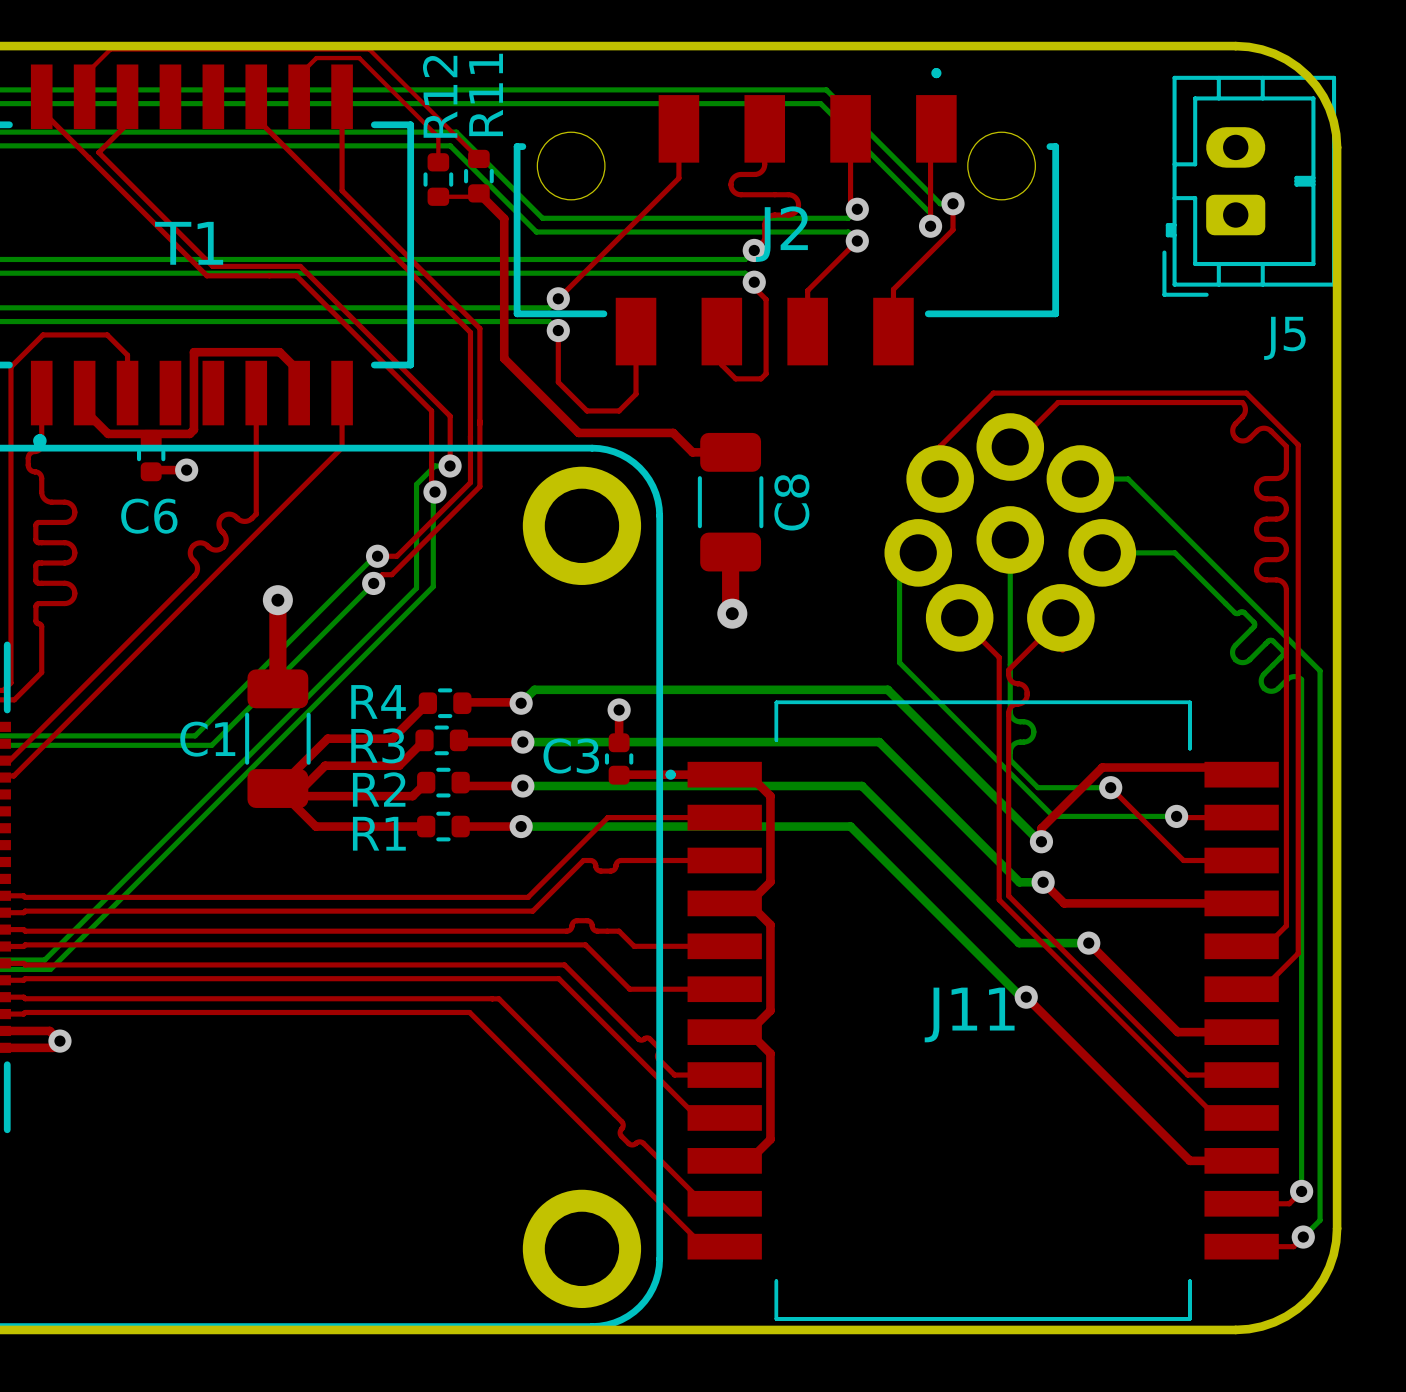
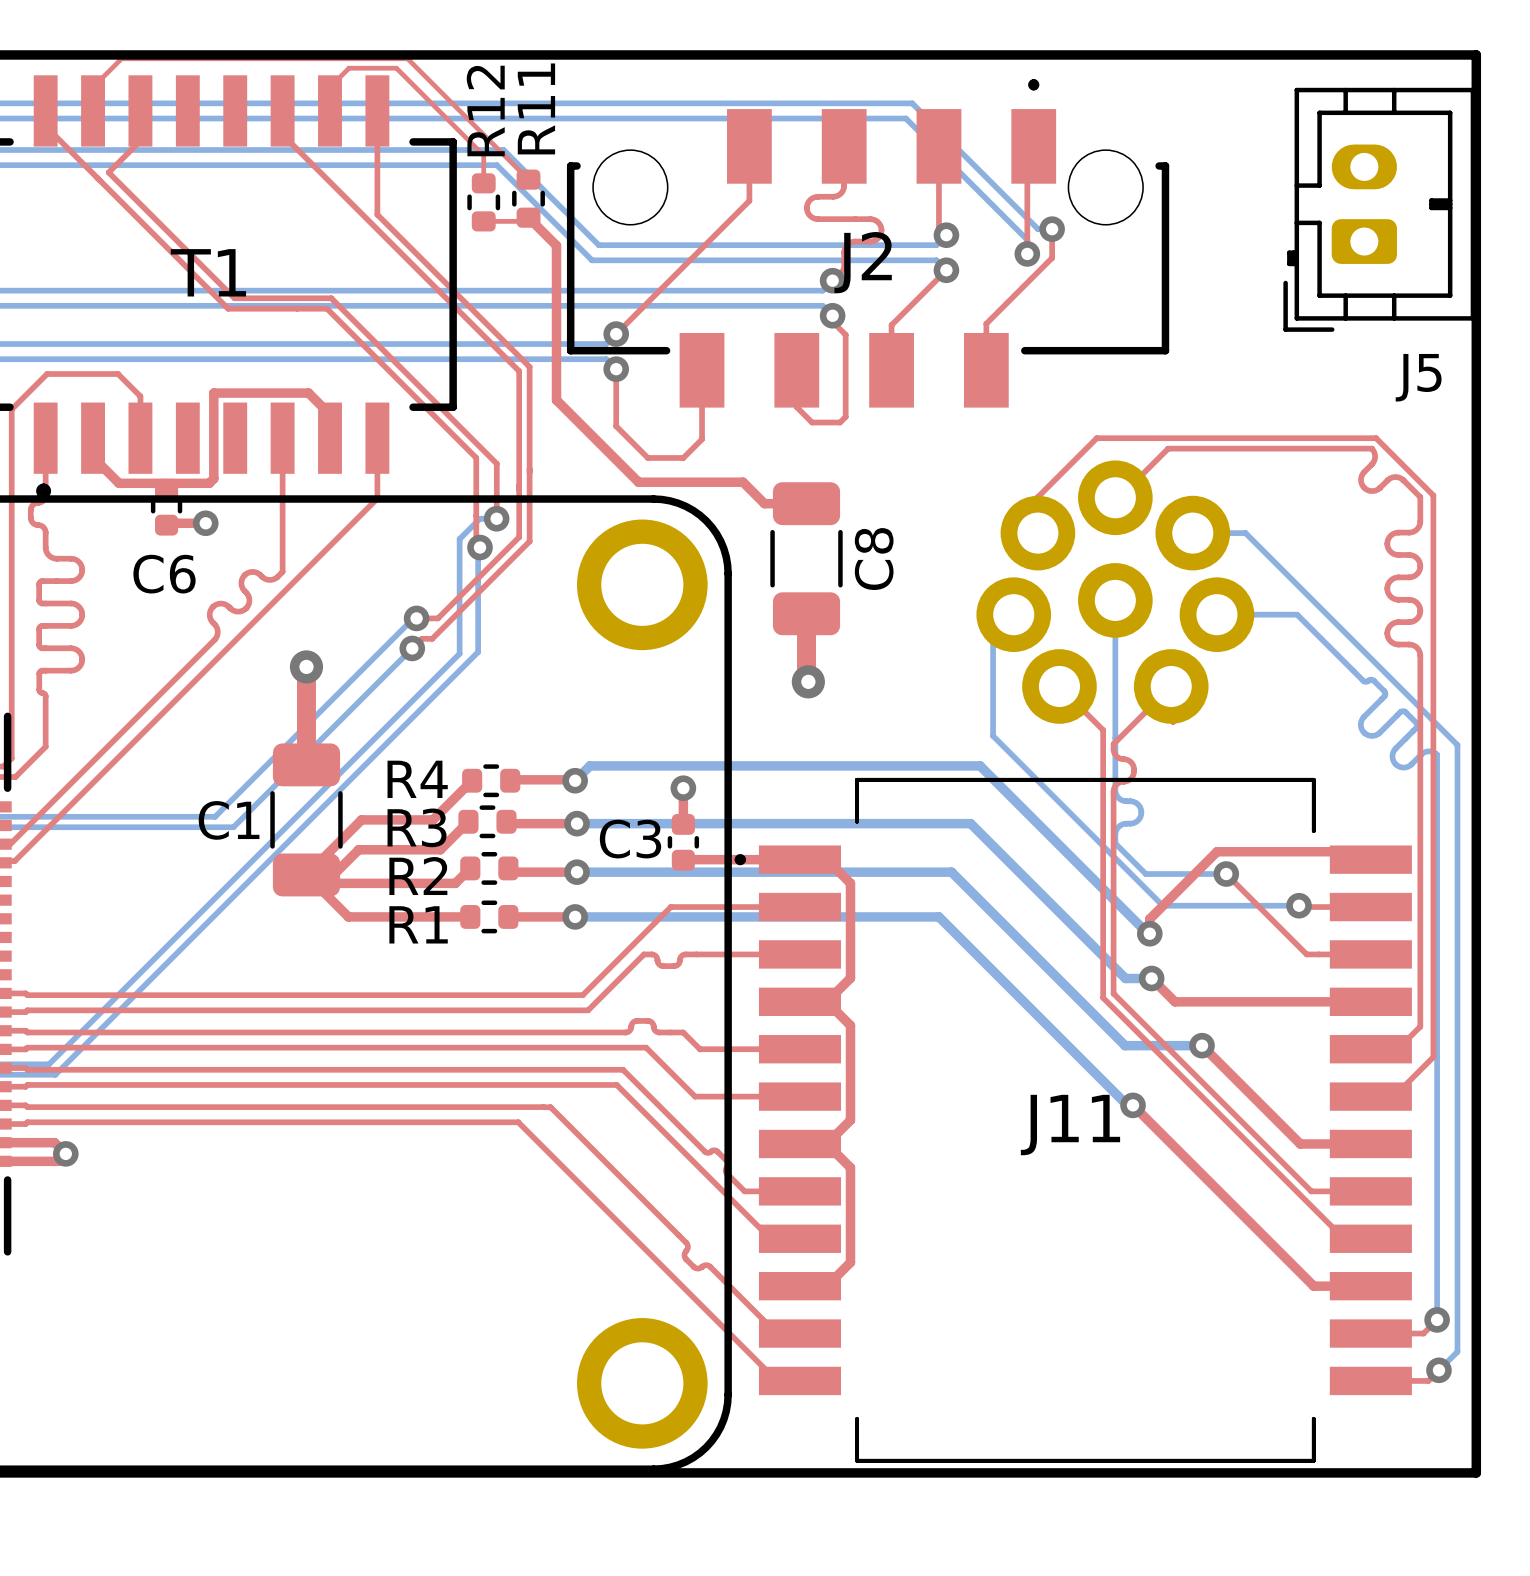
board edge: (1235, 46) (1248, 46) (1274, 53) (1297, 67) (1307, 75) (1316, 85) (1329, 108) (1336, 134) (1337, 147) -> (1364, 54) (1476, 54) (1476, 166)
board edge: (1337, 1228) (1333, 1254) (1329, 1267) (1316, 1290) (1307, 1300) (1286, 1316) (1274, 1322) (1248, 1329) (1235, 1329) -> (1476, 1360) (1476, 1472) (1364, 1472)

